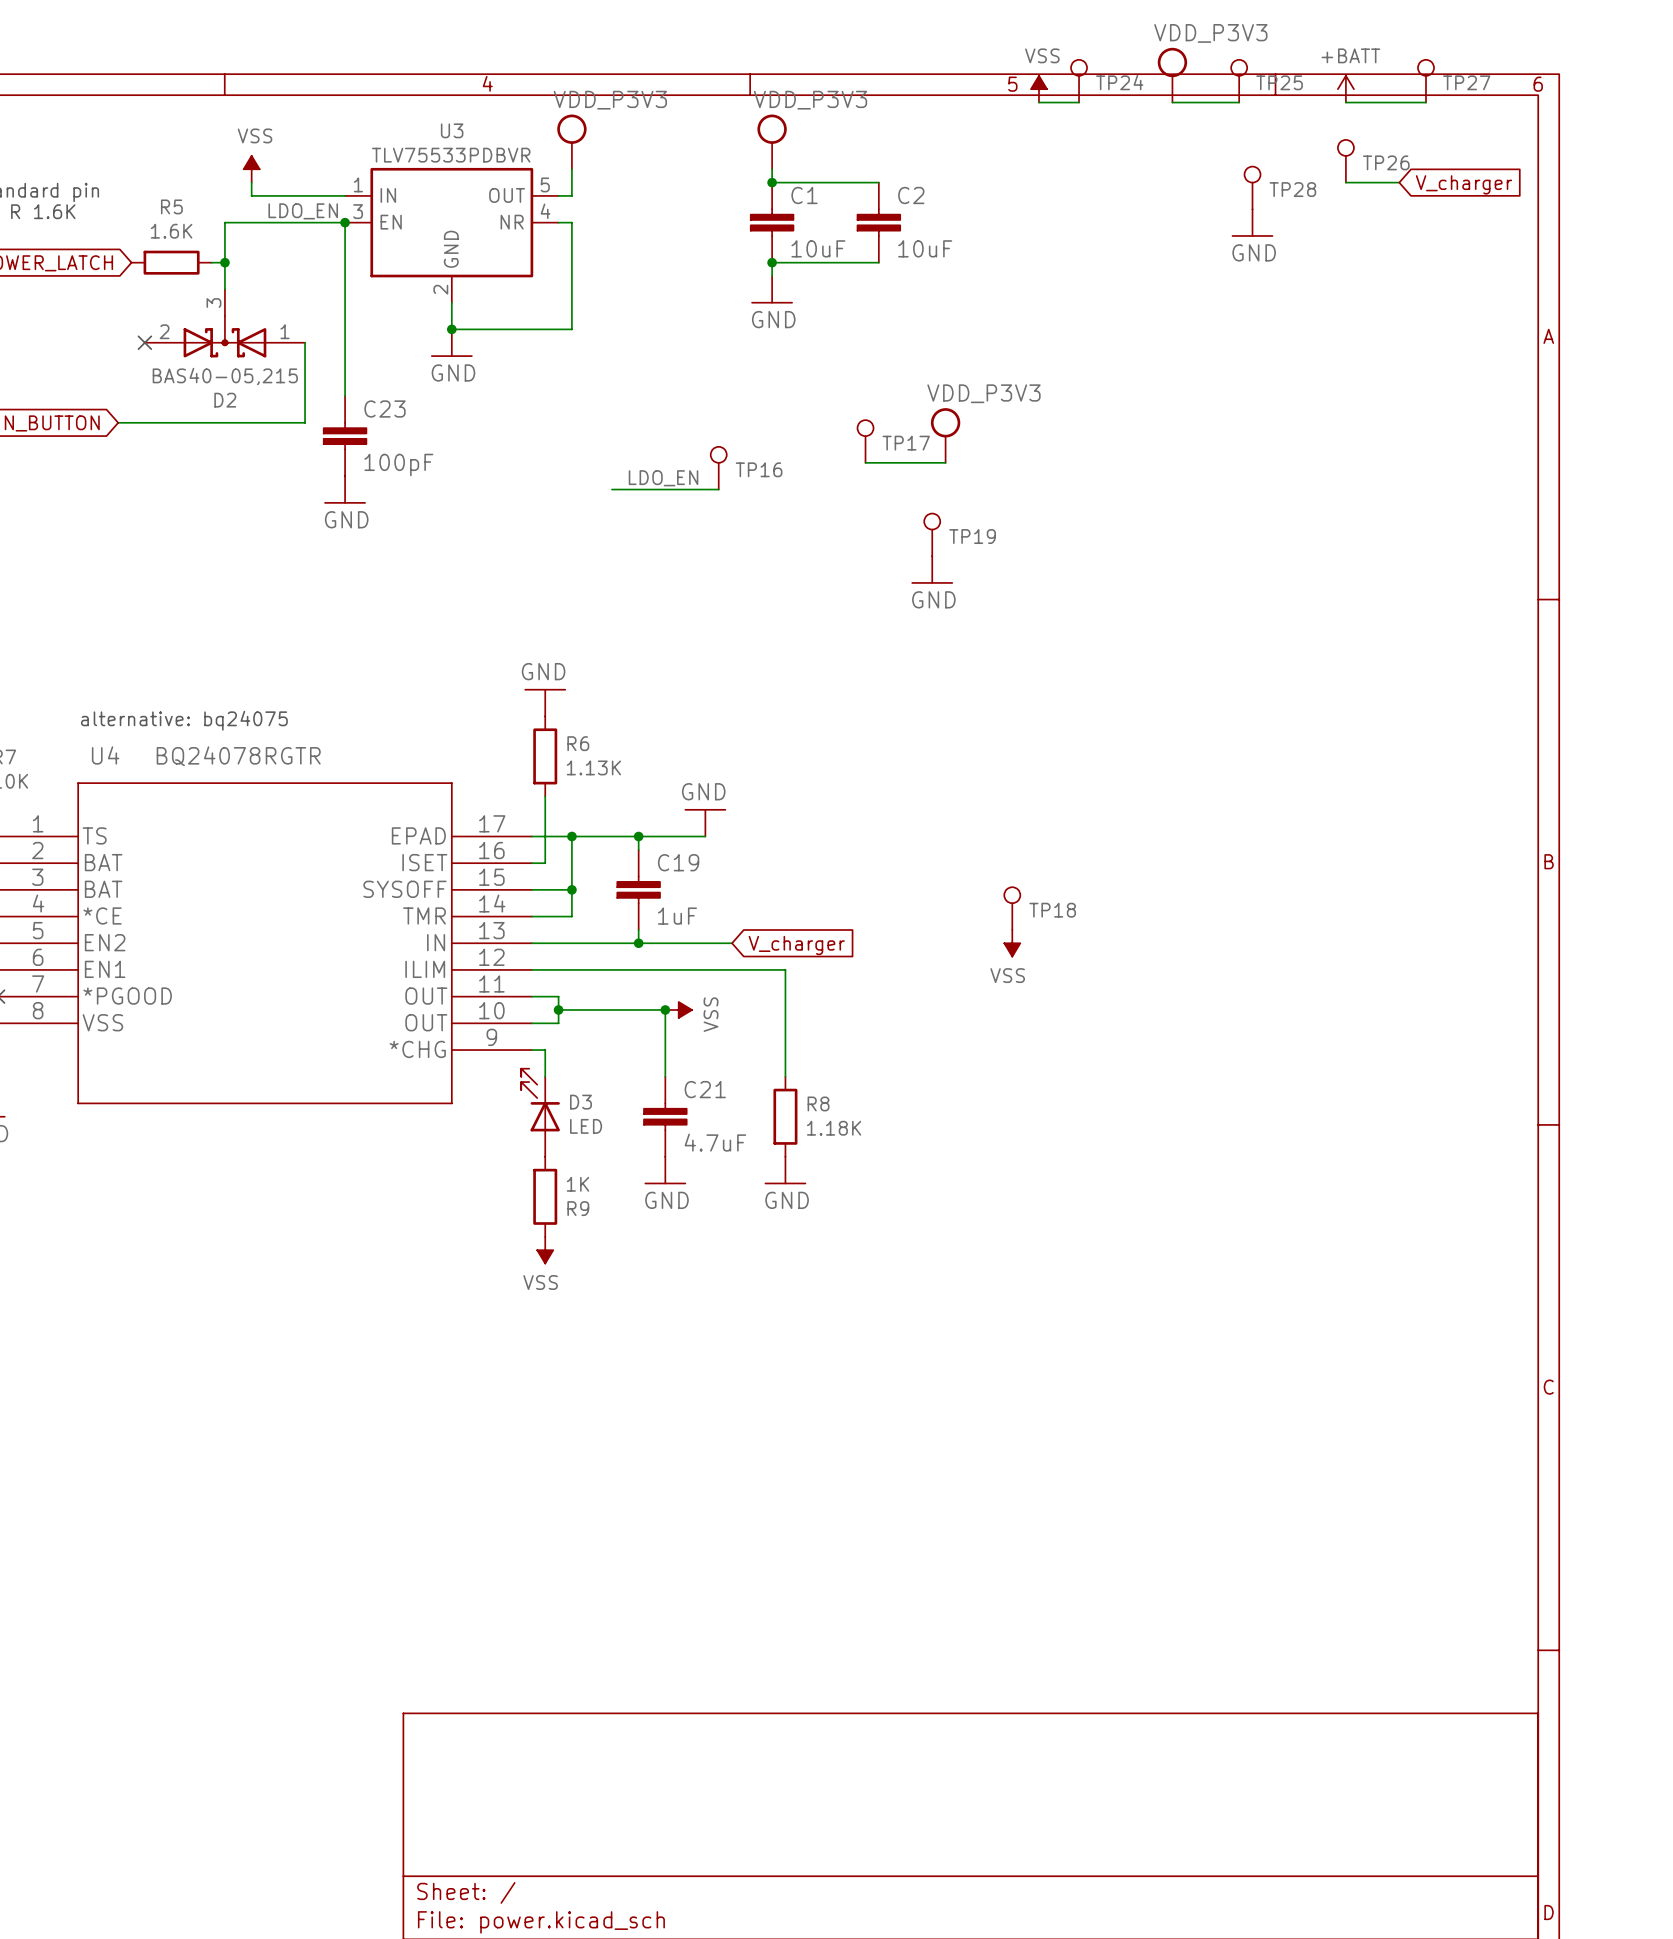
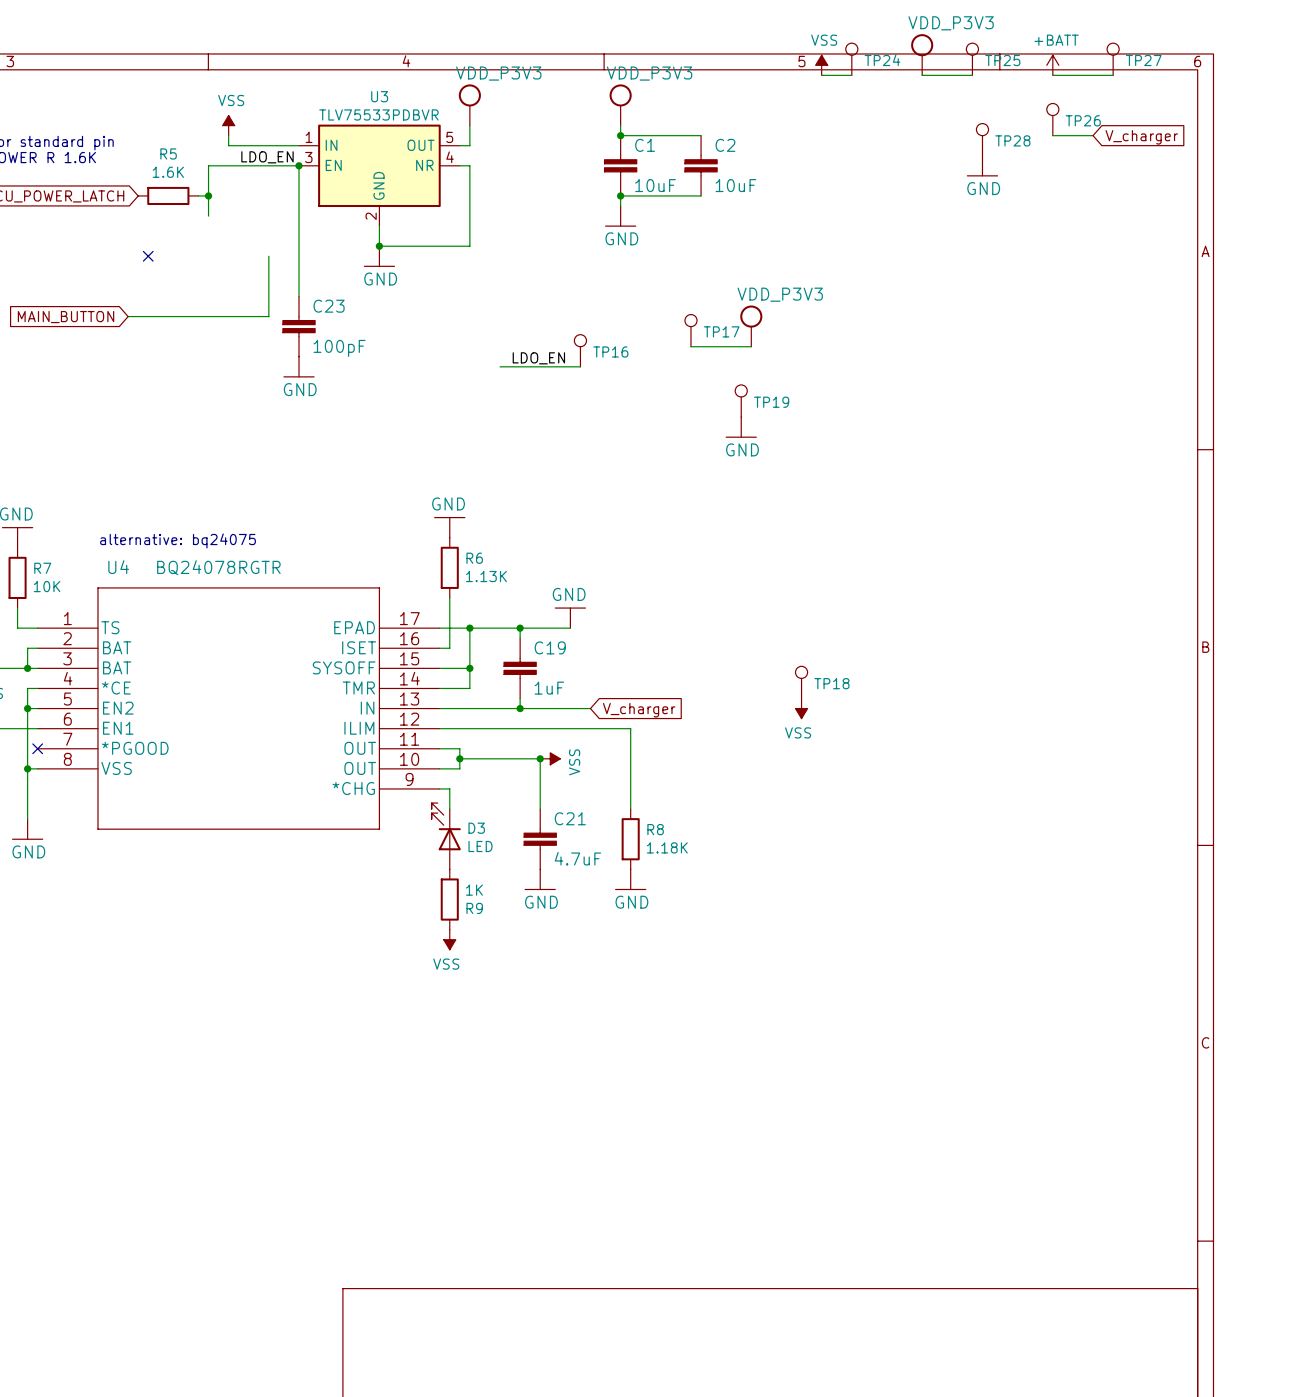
D2: BAS40-05,215 (224, 323) -> none

